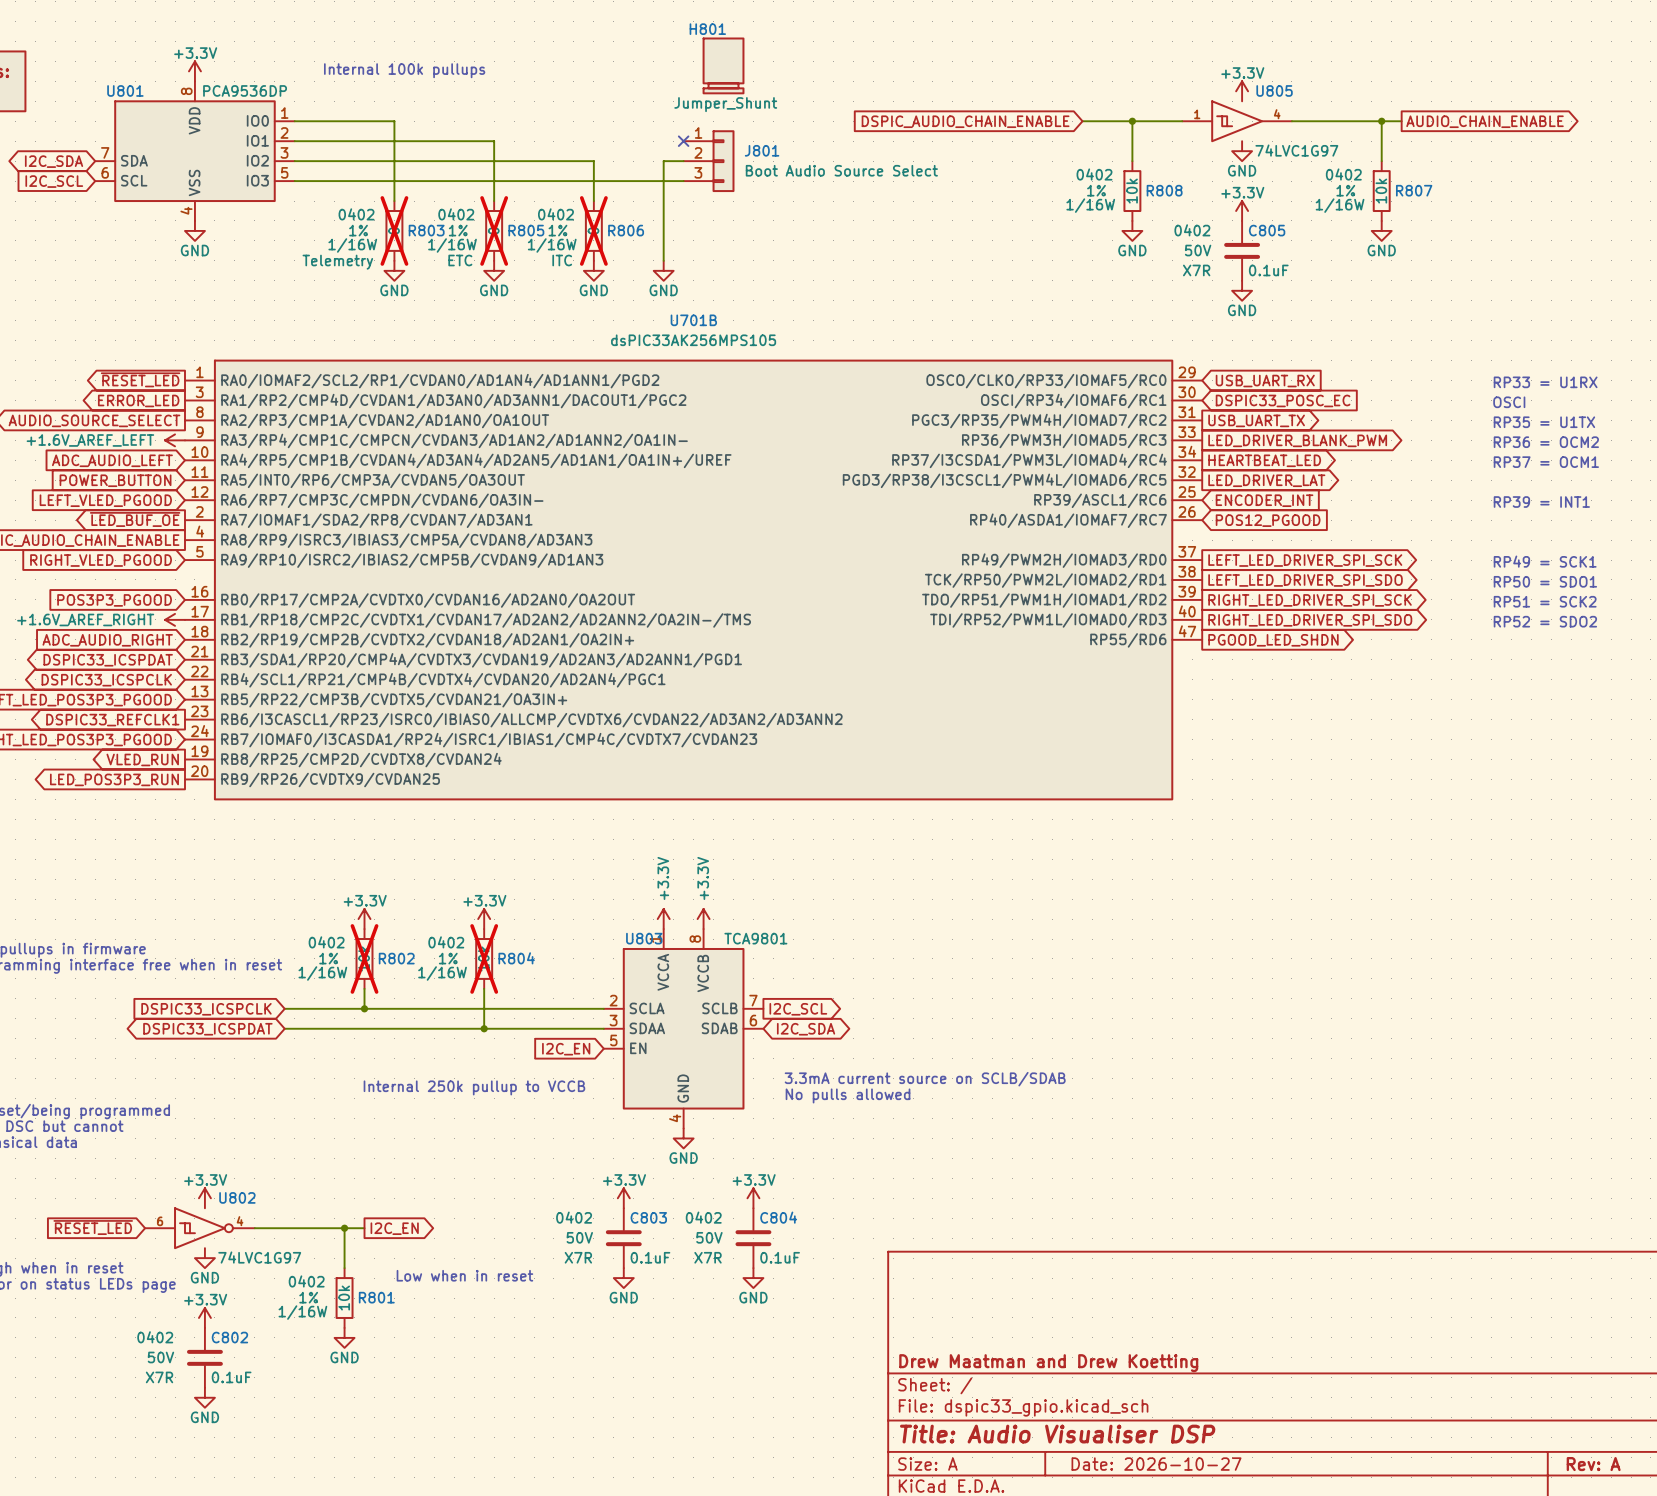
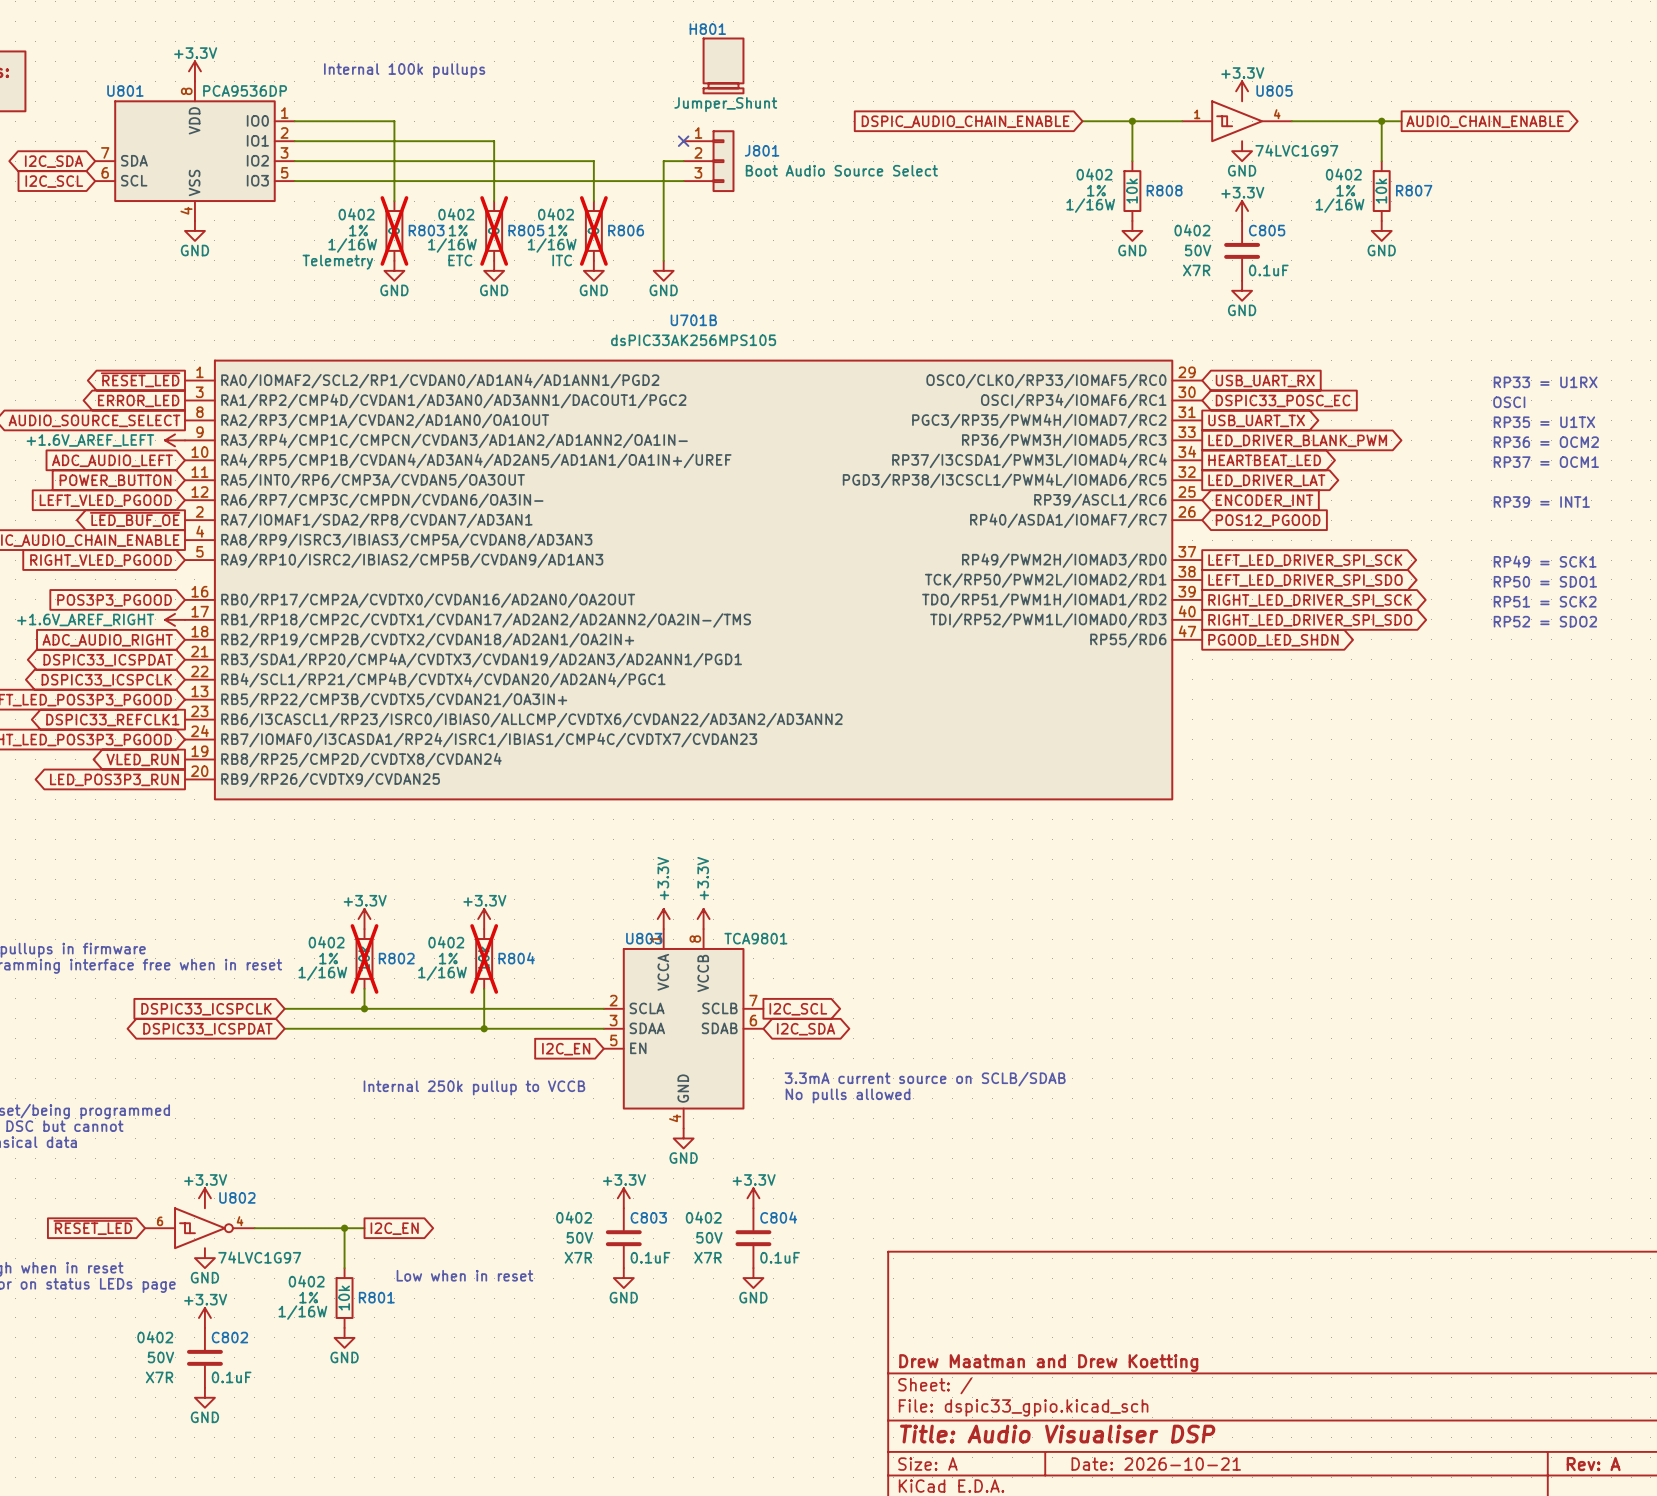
title block: Date: 2026-10-27 (1156, 1464) -> Date: 2026-10-21 (1156, 1464)

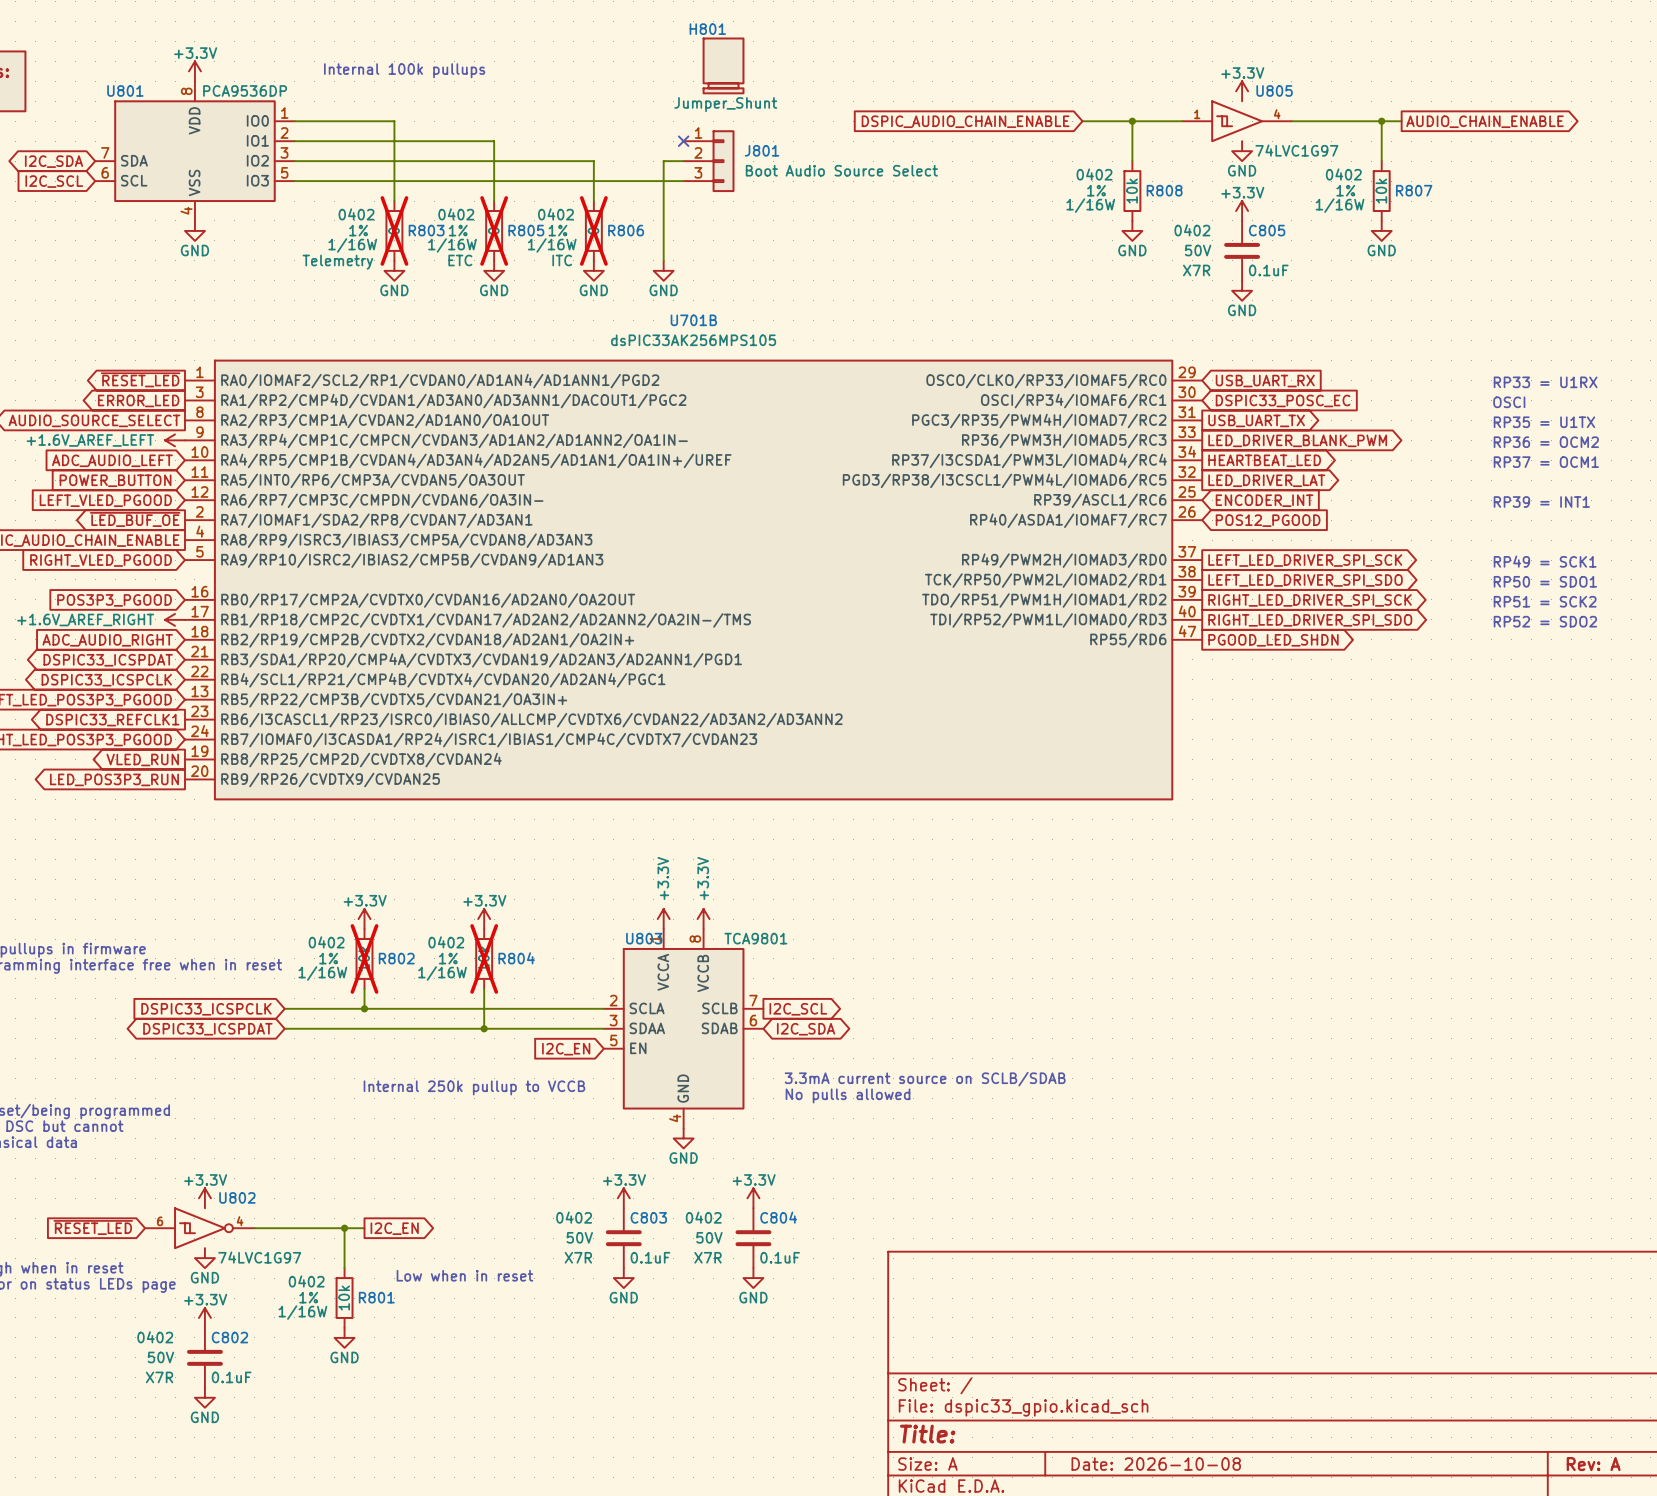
title block: Drew Maatman and Drew Koetting (1048, 1363) -> none
title block: Title: Audio Visualiser DSP (1057, 1434) -> Title: (927, 1434)
title block: Date: 2026-10-21 (1156, 1464) -> Date: 2026-10-08 (1156, 1464)

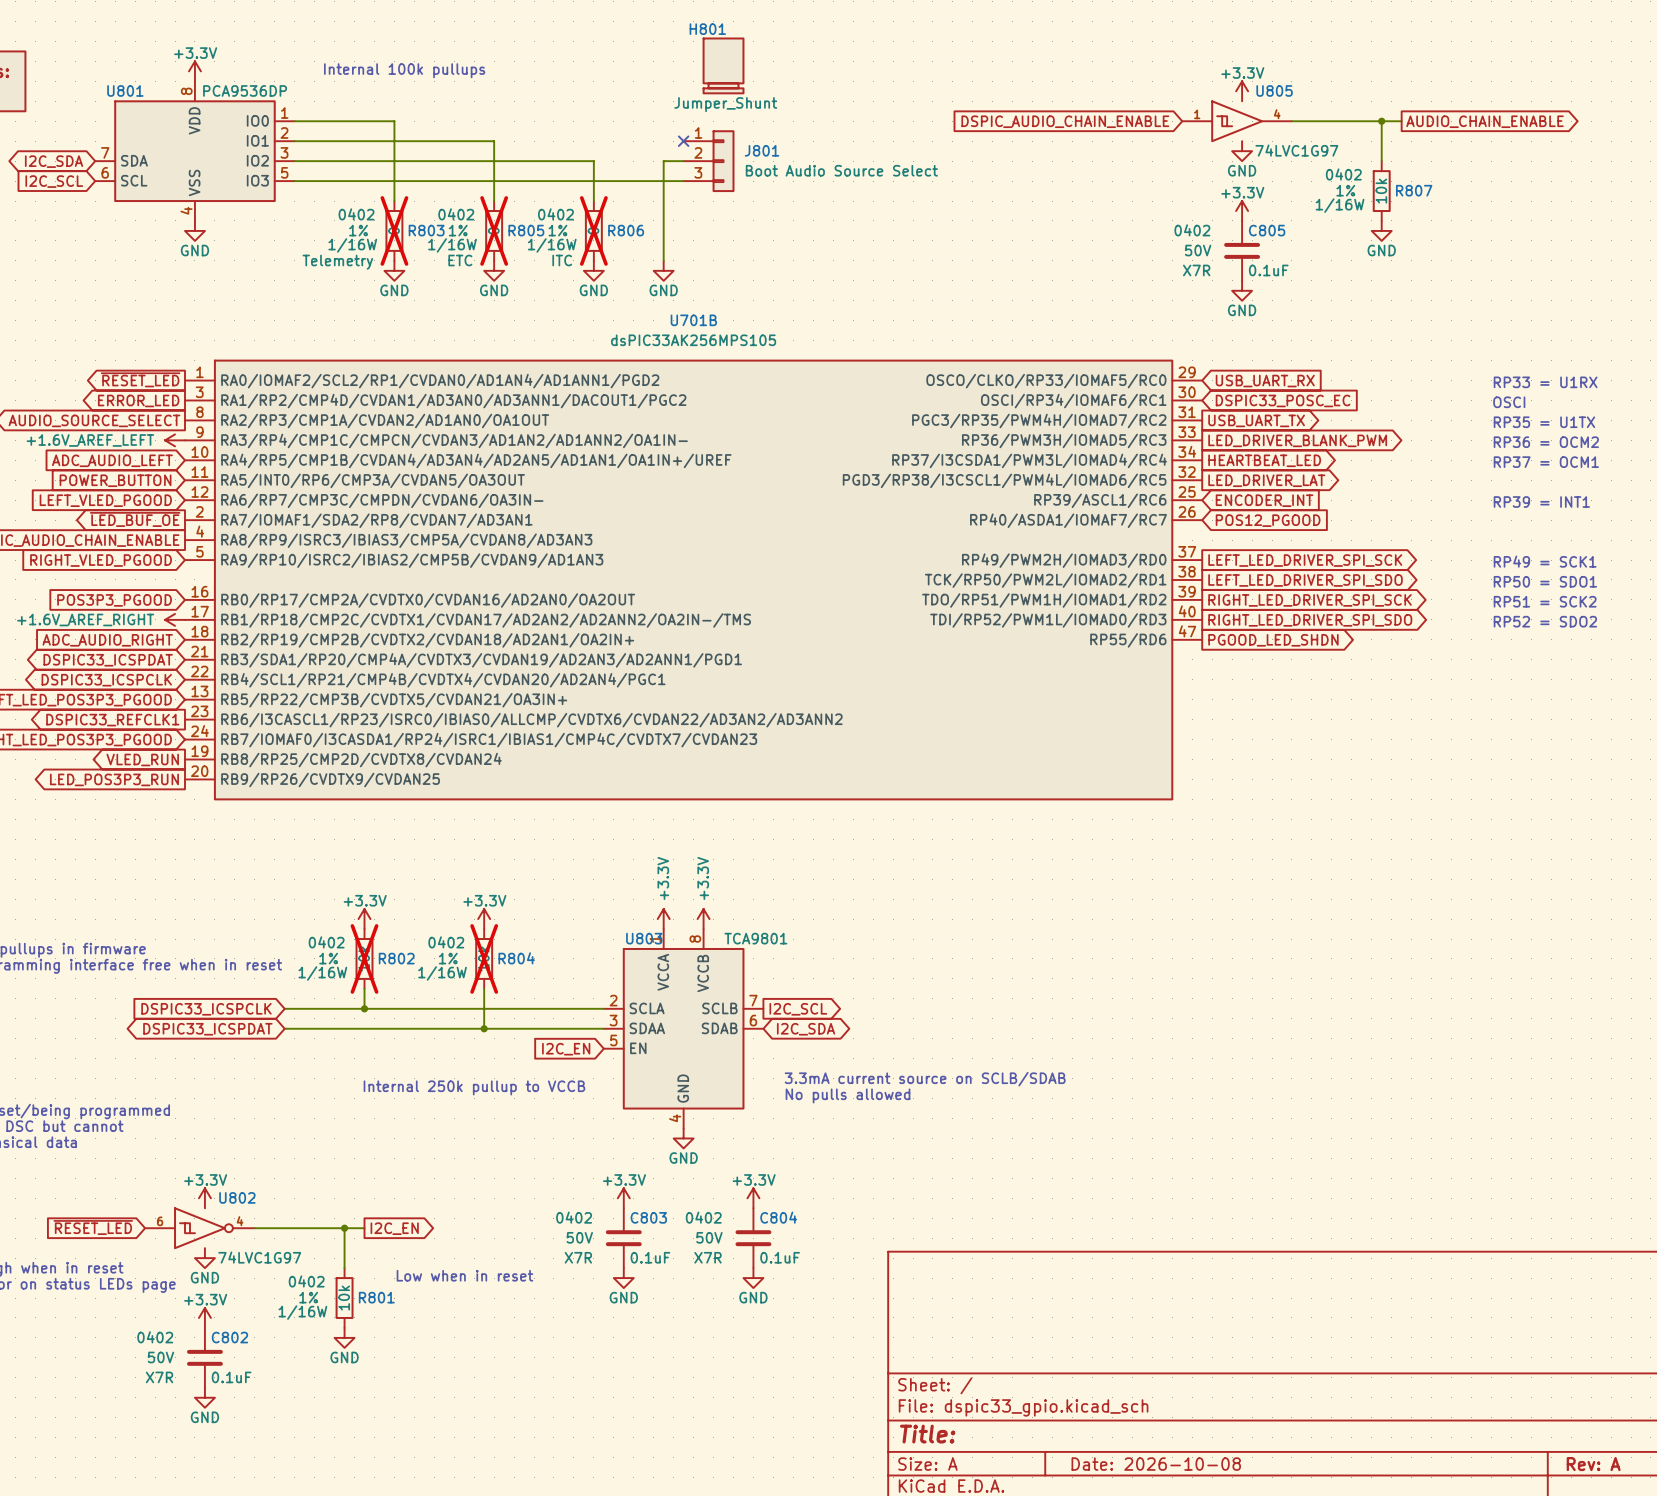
global label position: DSPIC_AUDIO_CHAIN_ENABLE (965, 121) -> DSPIC_AUDIO_CHAIN_ENABLE (1065, 121)
wire: (1082, 121) (1182, 121) -> none
wire: (1132, 121) (1132, 161) -> none
junction: (1132, 121) -> none
R808: 10k (1132, 191) -> none
power symbol: GND (1132, 230) -> none

